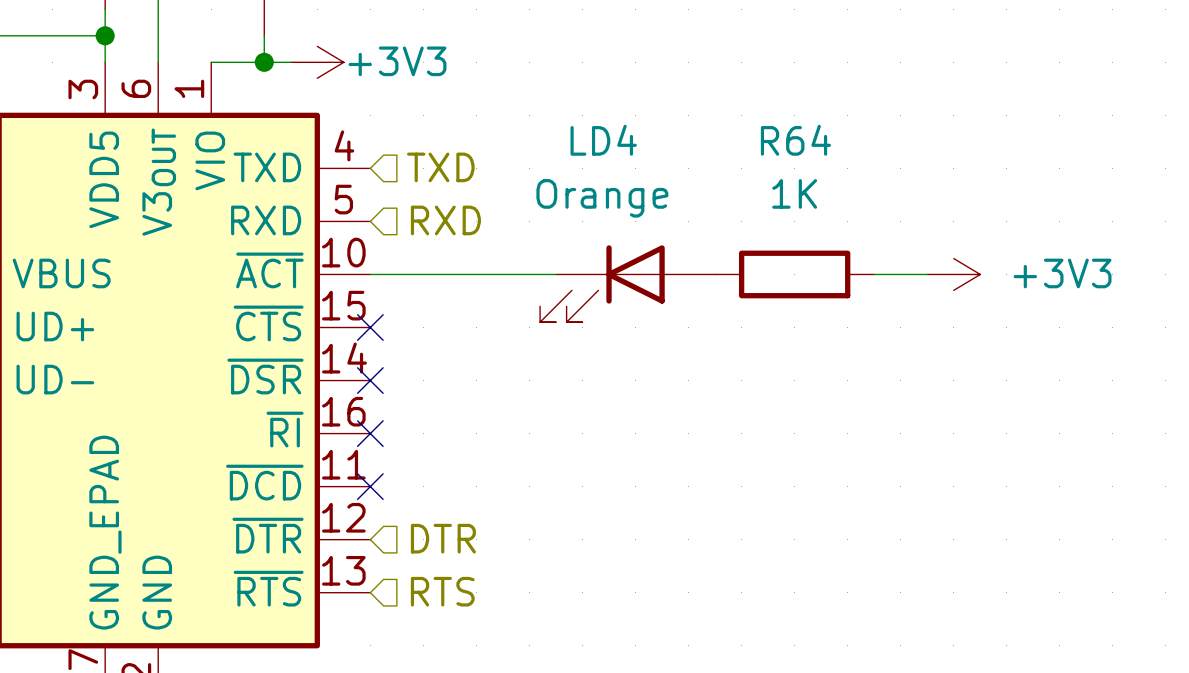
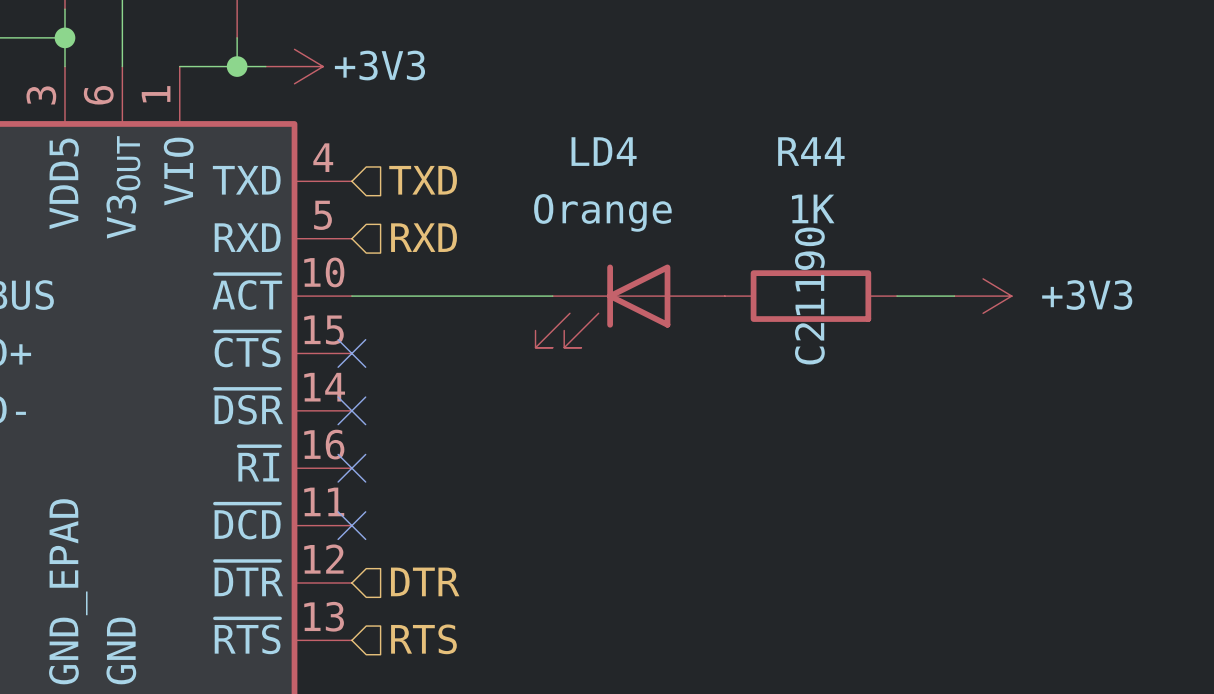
R64 name: R64 (795, 140) -> R44 (811, 151)
R64 text: none -> C21190 (809, 296)

